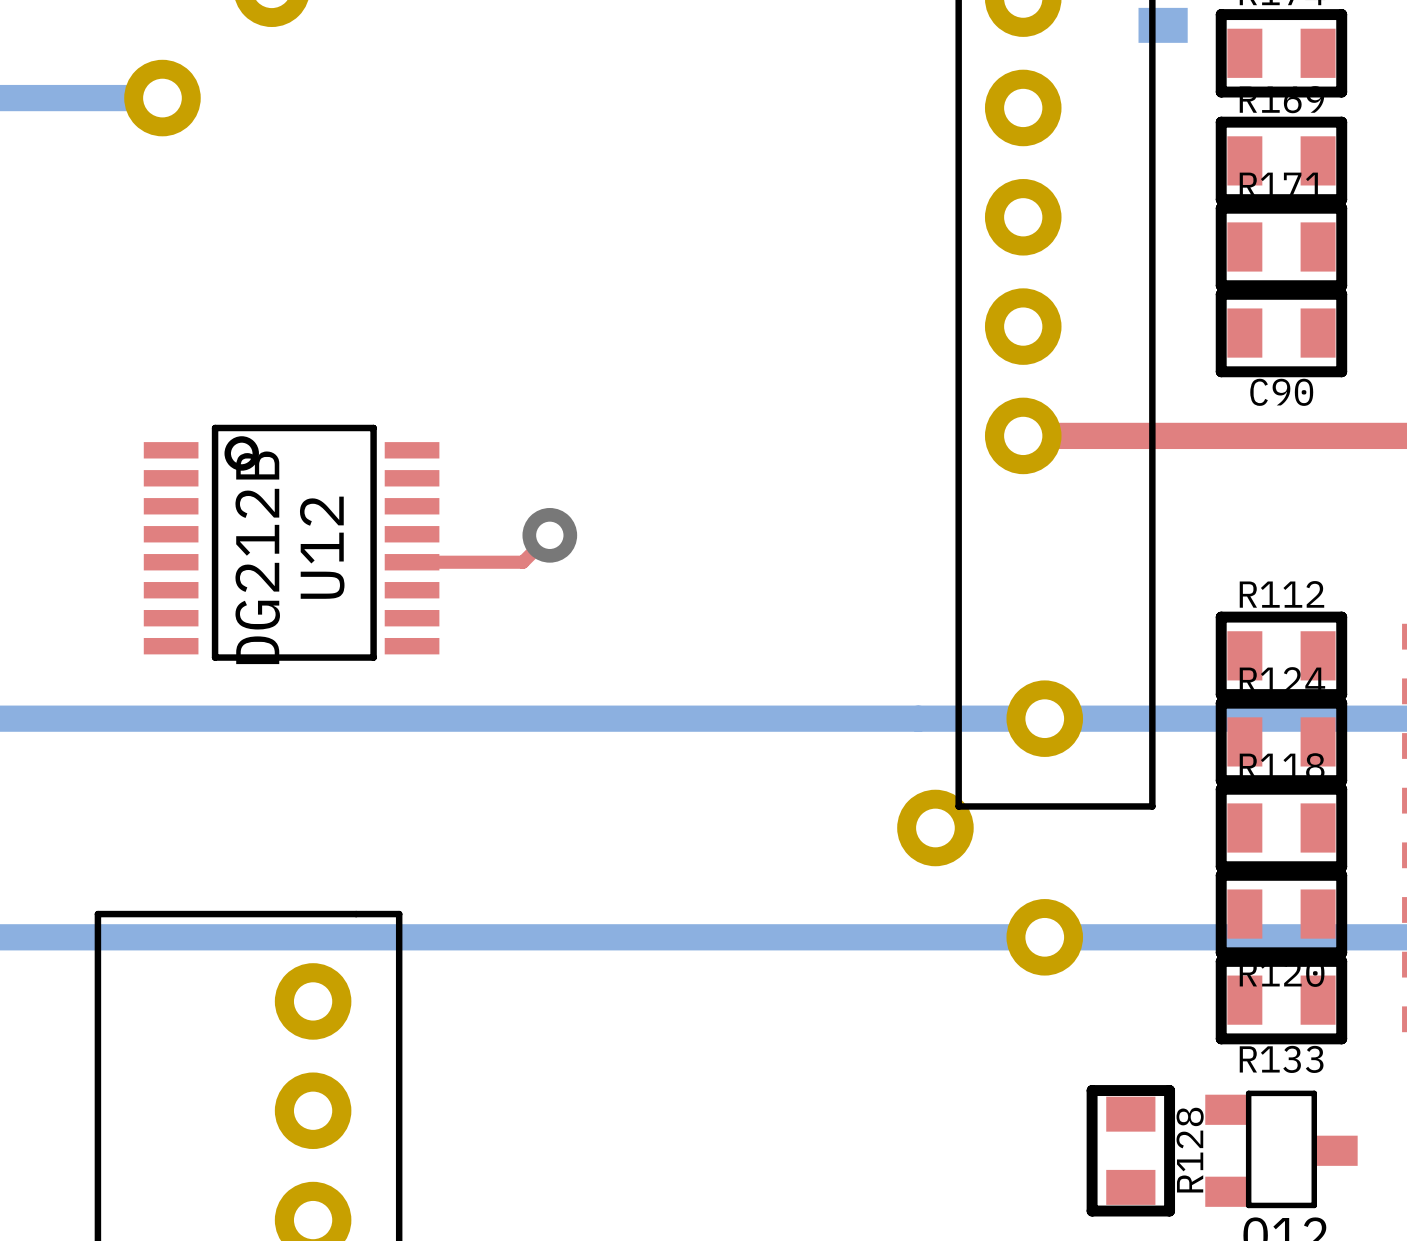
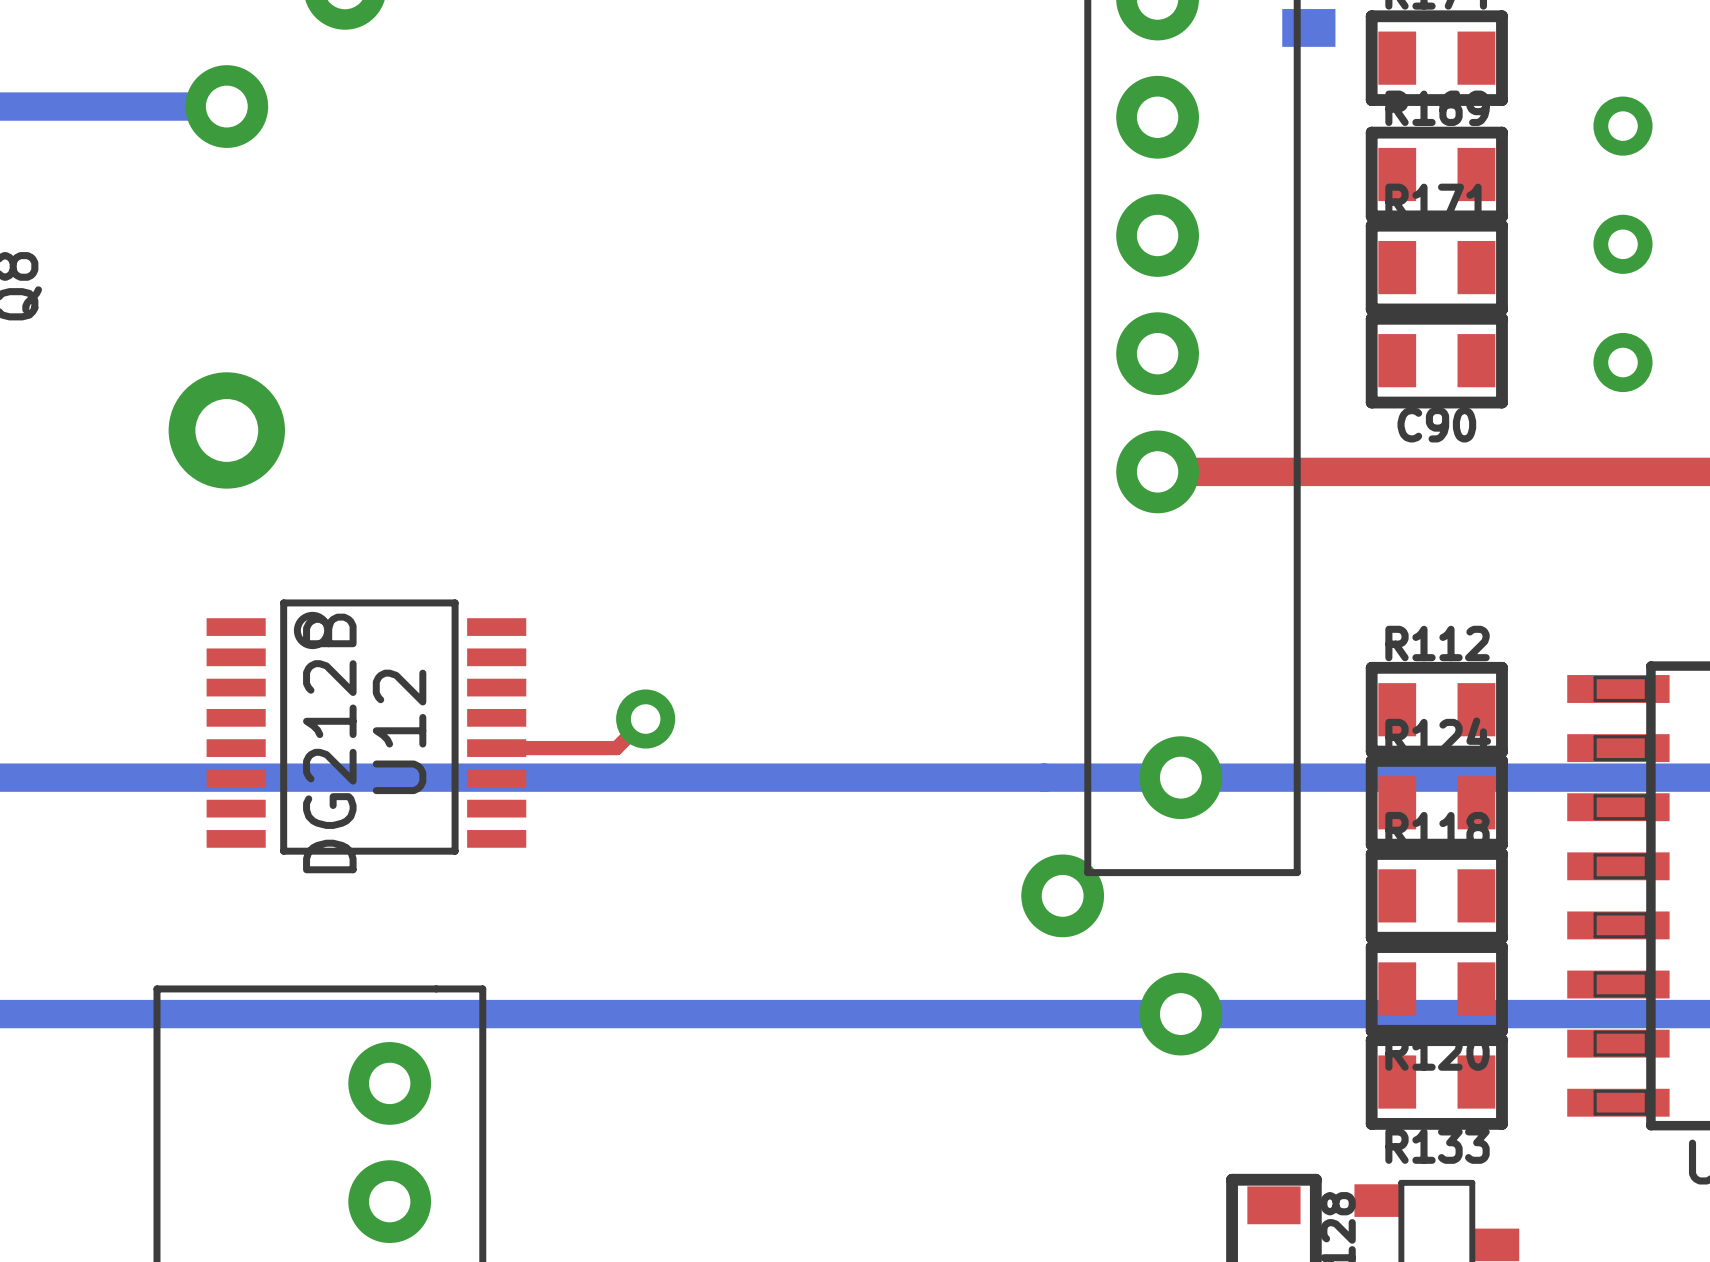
part: none -> (226, 430)
top track: (549, 535) (522, 562) (412, 562) -> (645, 719) (616, 748) (496, 748)
via position: (549, 535) -> (645, 719)
U12 position: (291, 542) -> (366, 727)

